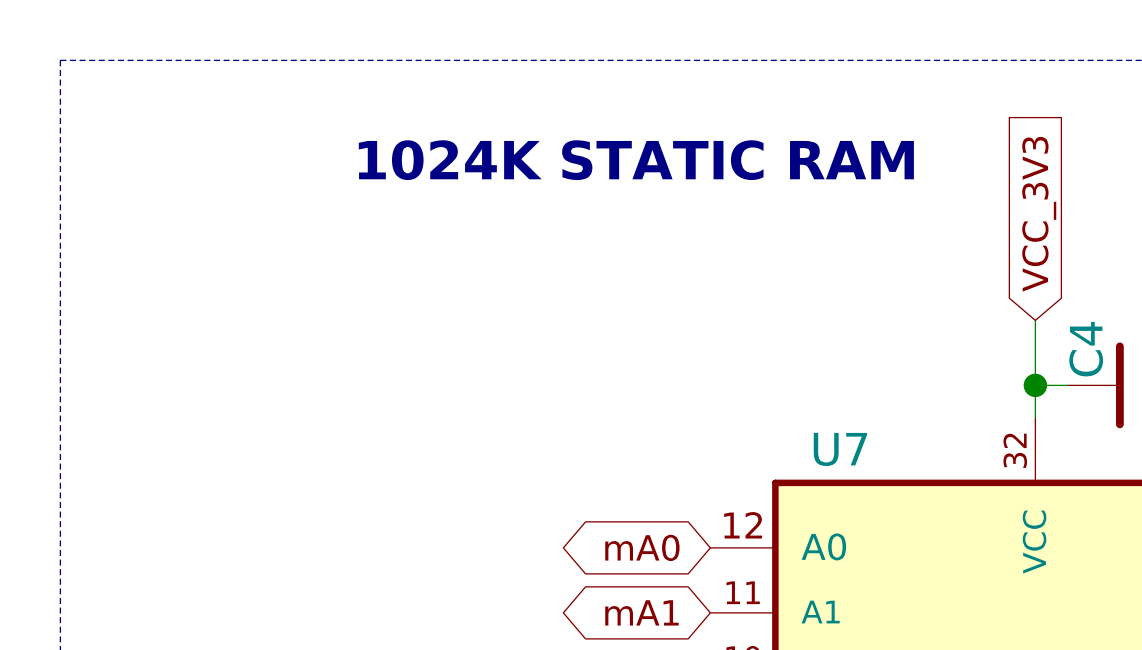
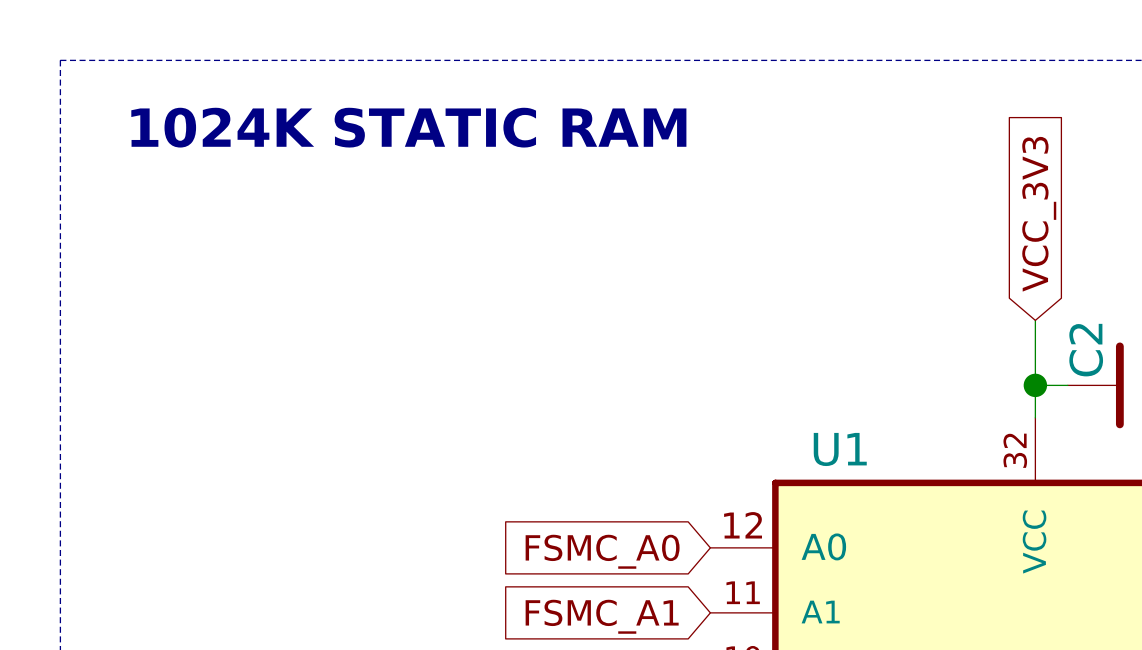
text position: 1024K STATIC RAM (636, 160) -> 1024K STATIC RAM (408, 127)
C4 name: C4 (1086, 349) -> C2 (1086, 350)
U7 name: U7 (840, 449) -> U1 (840, 449)
global label shape: bidirectional (642, 547) -> input (602, 551)
global label: mA0 (642, 547) -> FSMC_A0 (602, 551)
global label shape: bidirectional (641, 612) -> input (602, 616)
global label: mA1 (641, 612) -> FSMC_A1 (602, 616)

